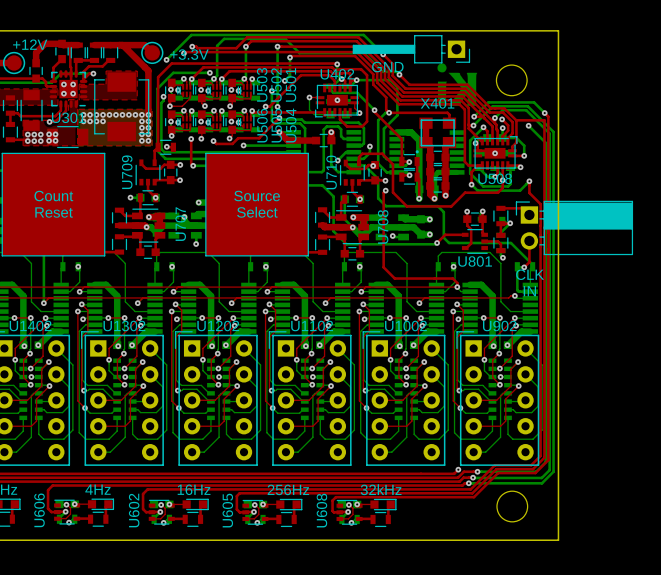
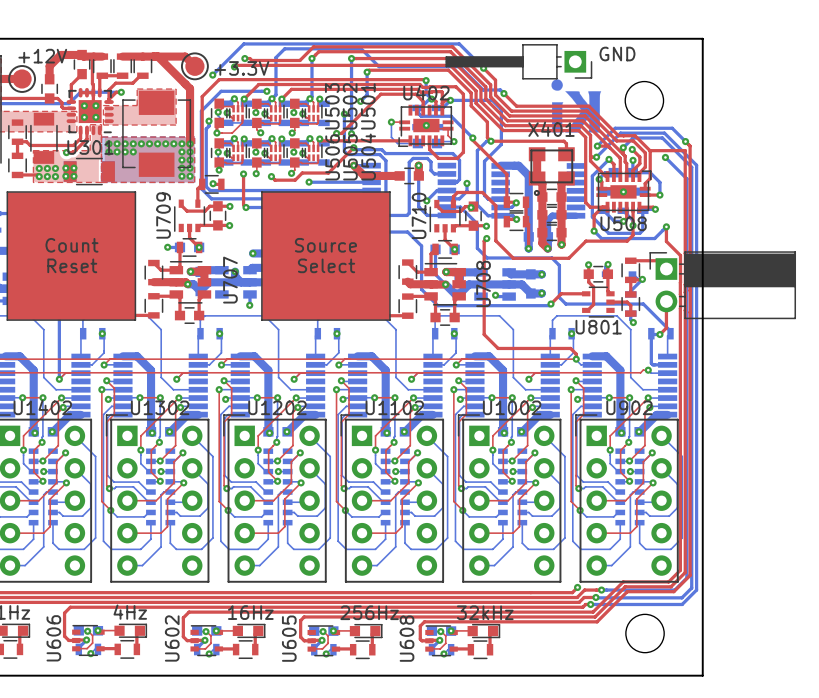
text position: GND (387, 67) -> GND (617, 54)
X401 footprint: [415, 117, 457, 154] -> [528, 147, 575, 196]
text: CLK (530, 274) -> none
text: IN (529, 291) -> none

